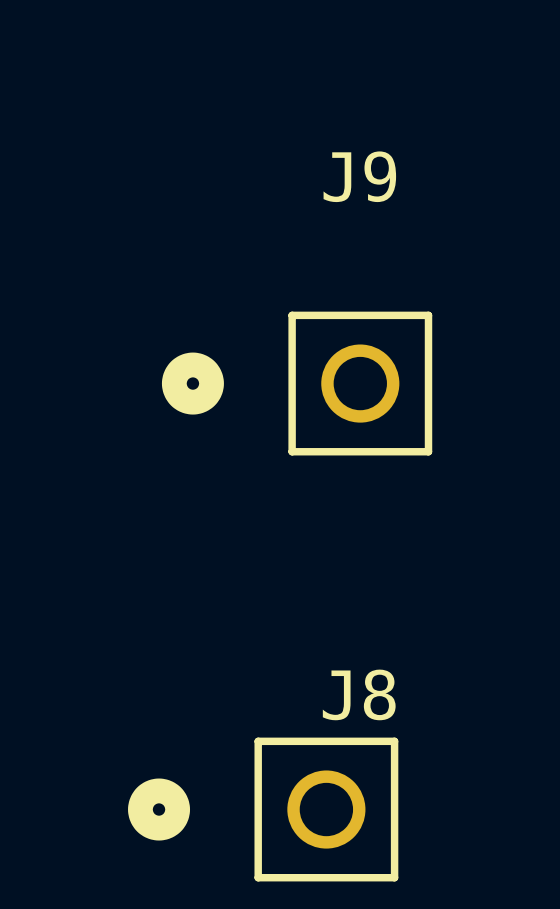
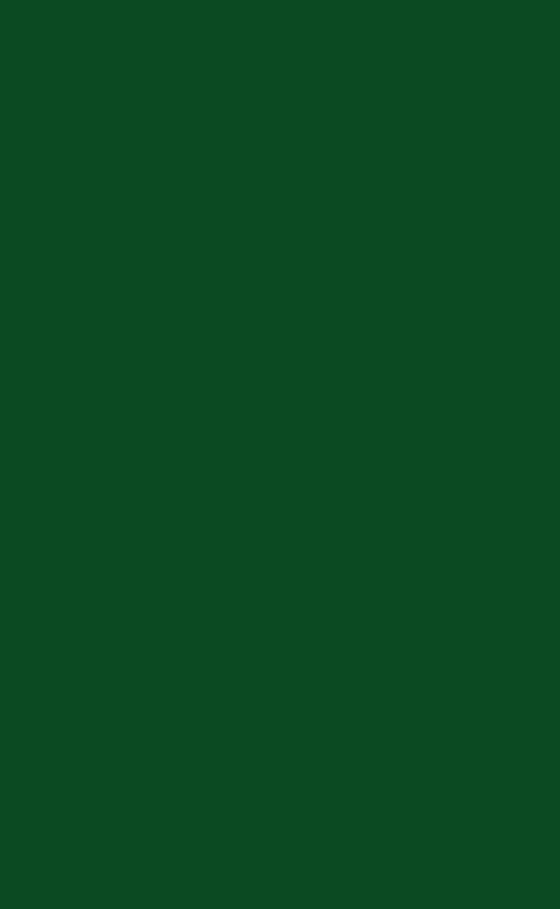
J9: (297, 383) -> none
J8: (263, 809) -> none

